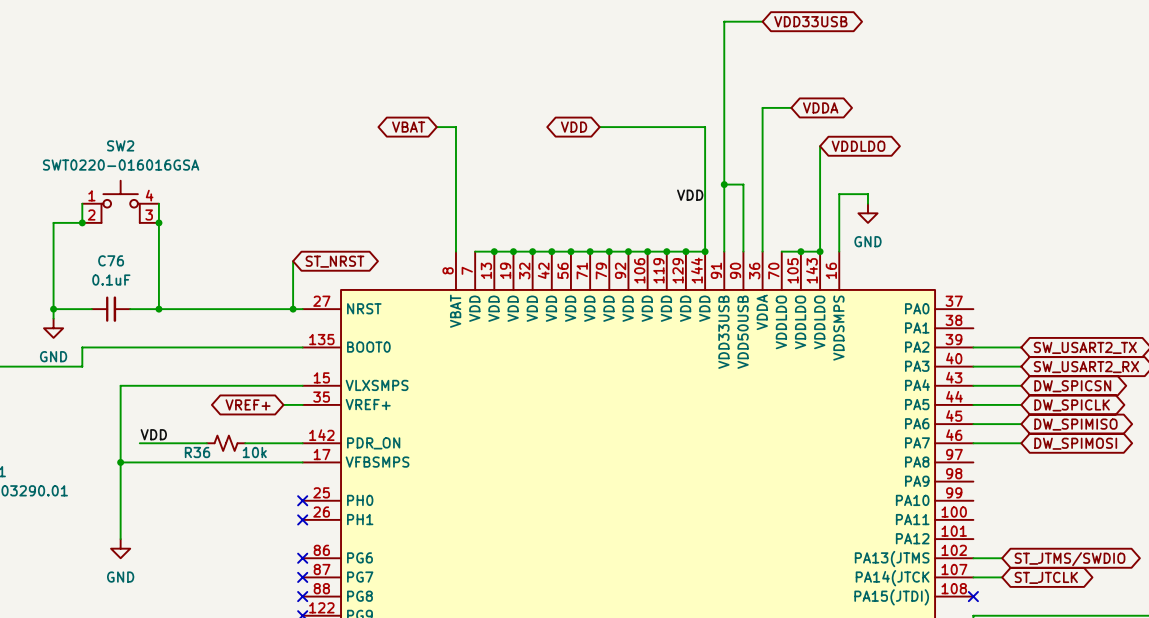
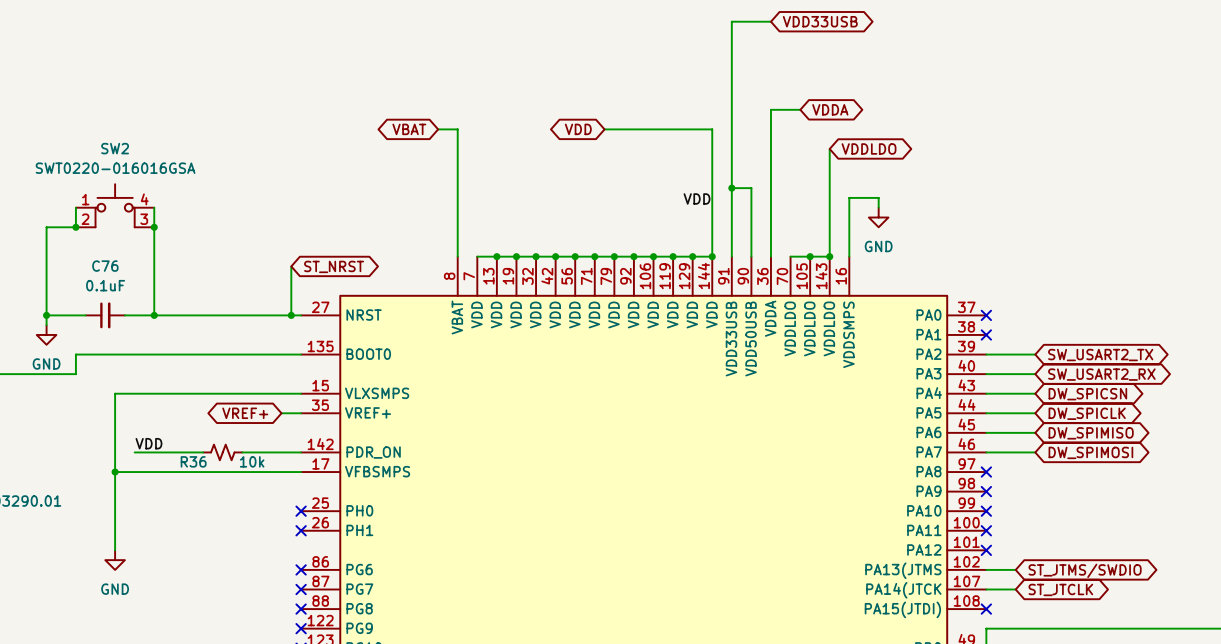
no-connect mark: none -> (986, 315)
no-connect mark: none -> (986, 334)
no-connect mark: none -> (986, 472)
no-connect mark: none -> (986, 491)
no-connect mark: none -> (986, 511)
no-connect mark: none -> (986, 530)
no-connect mark: none -> (986, 550)

